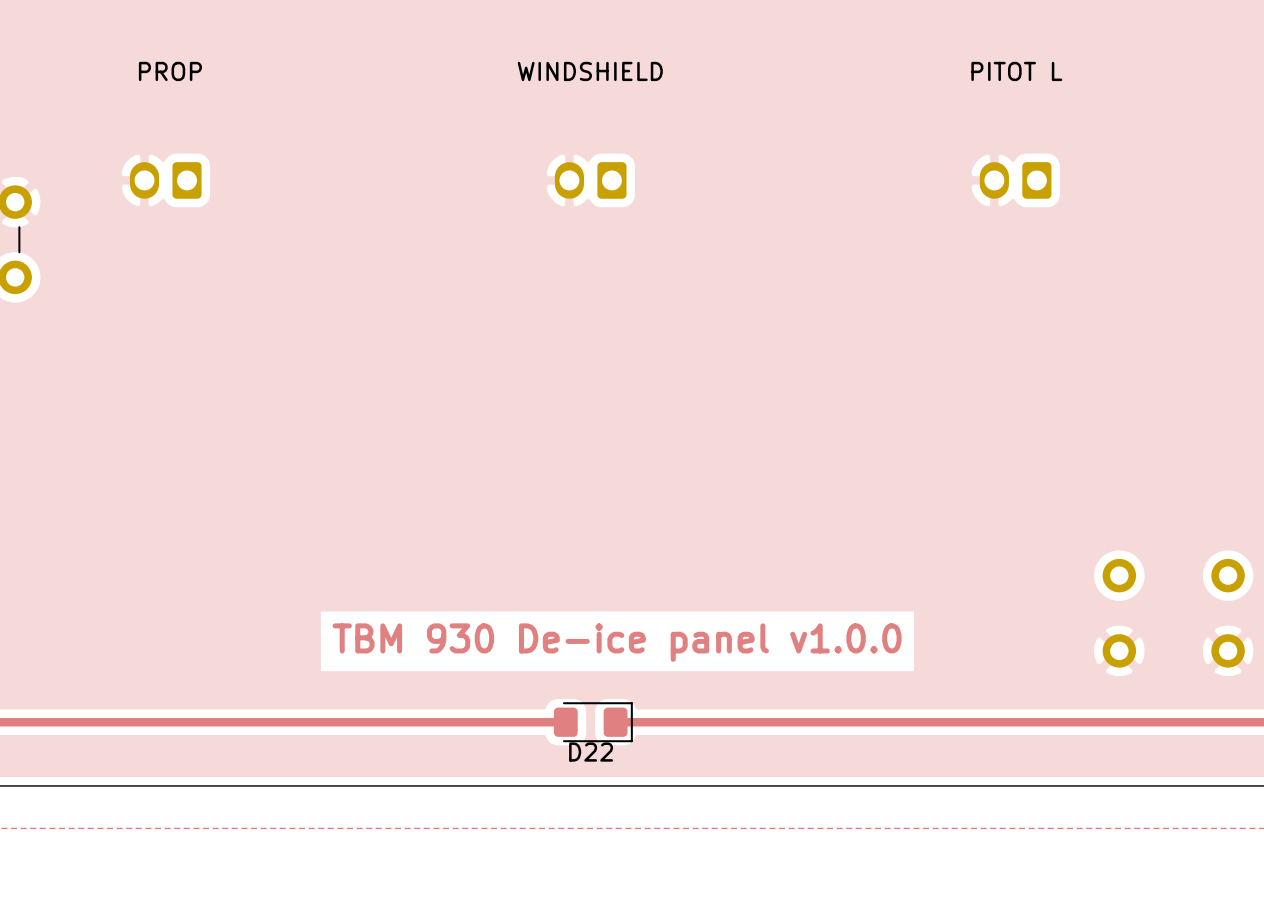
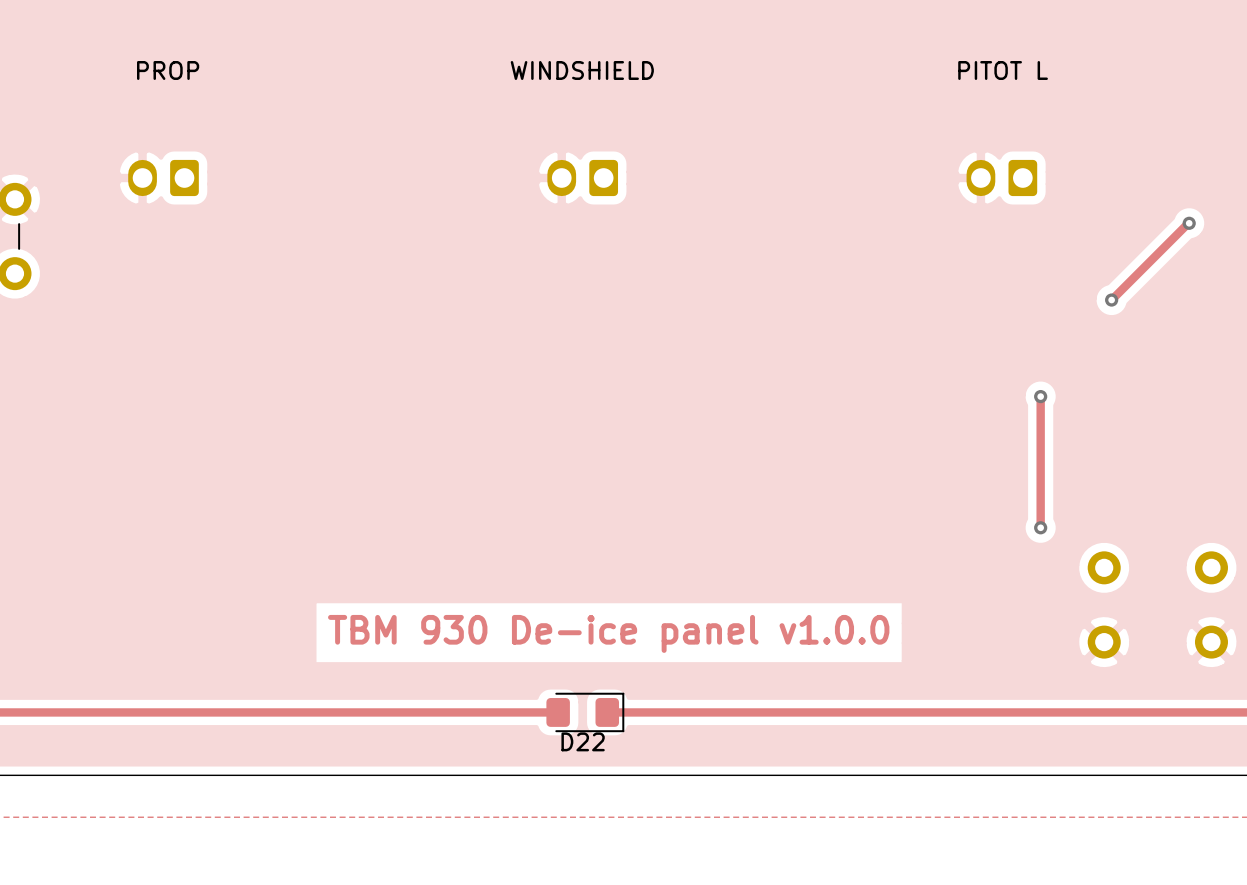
track: none -> (1189, 223) (1111, 300)
via: none -> (1189, 223)
via: none -> (1111, 300)
track: none -> (1040, 396) (1040, 527)
via: none -> (1040, 396)
via: none -> (1040, 527)

